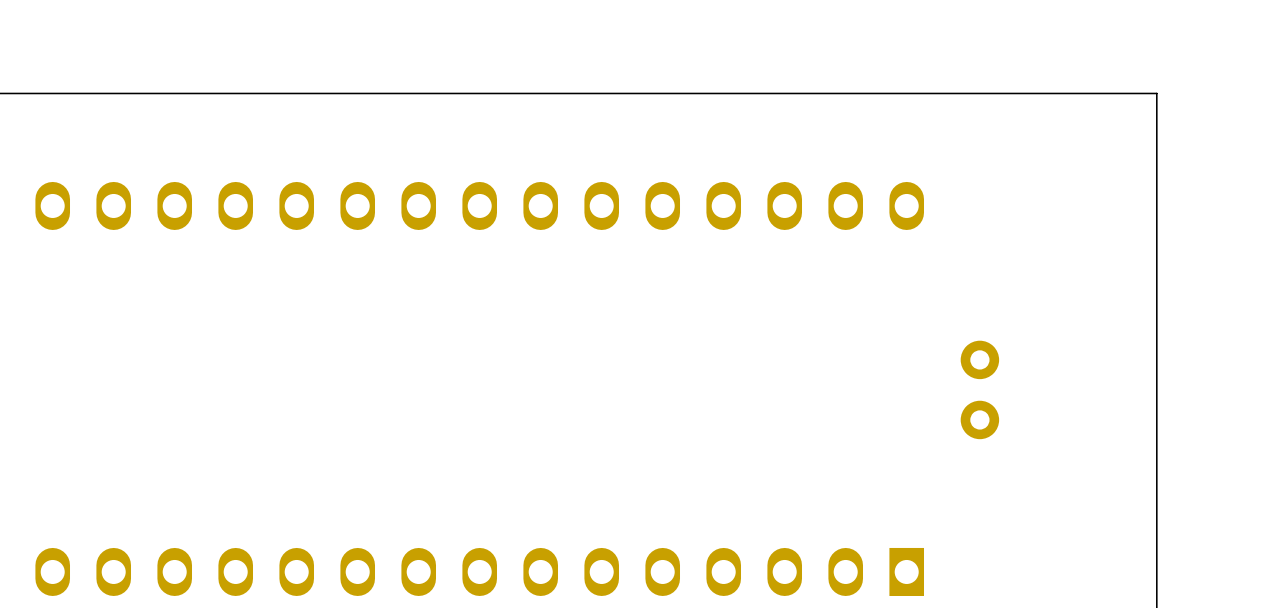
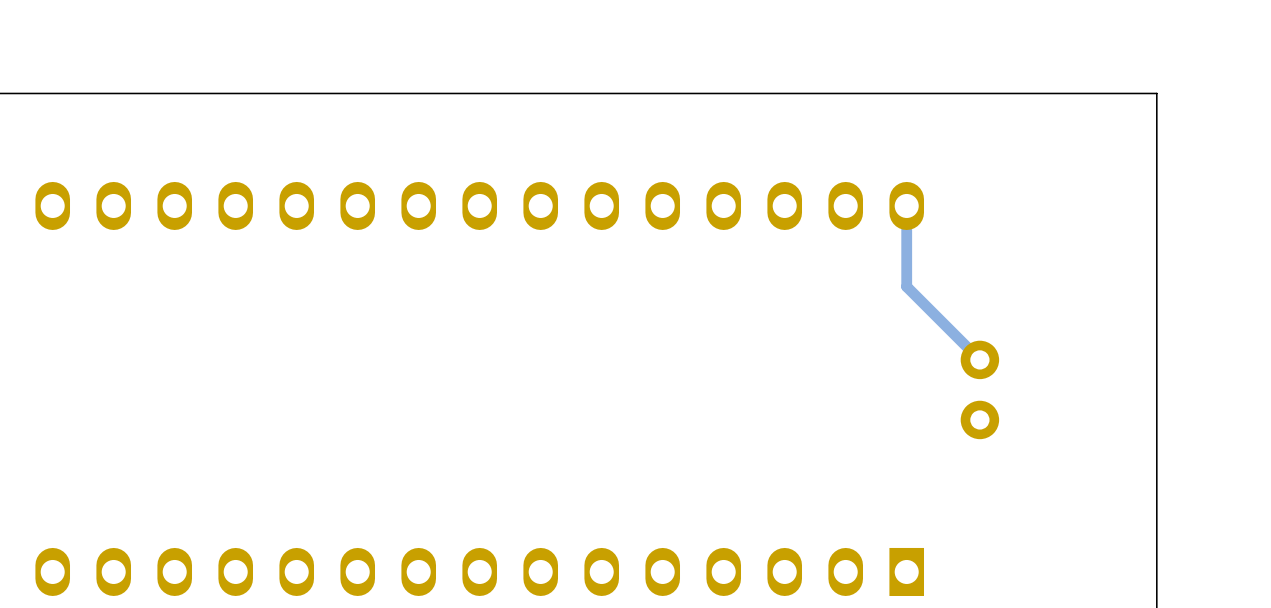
track: none -> (906, 205) (906, 286) (979, 359)

